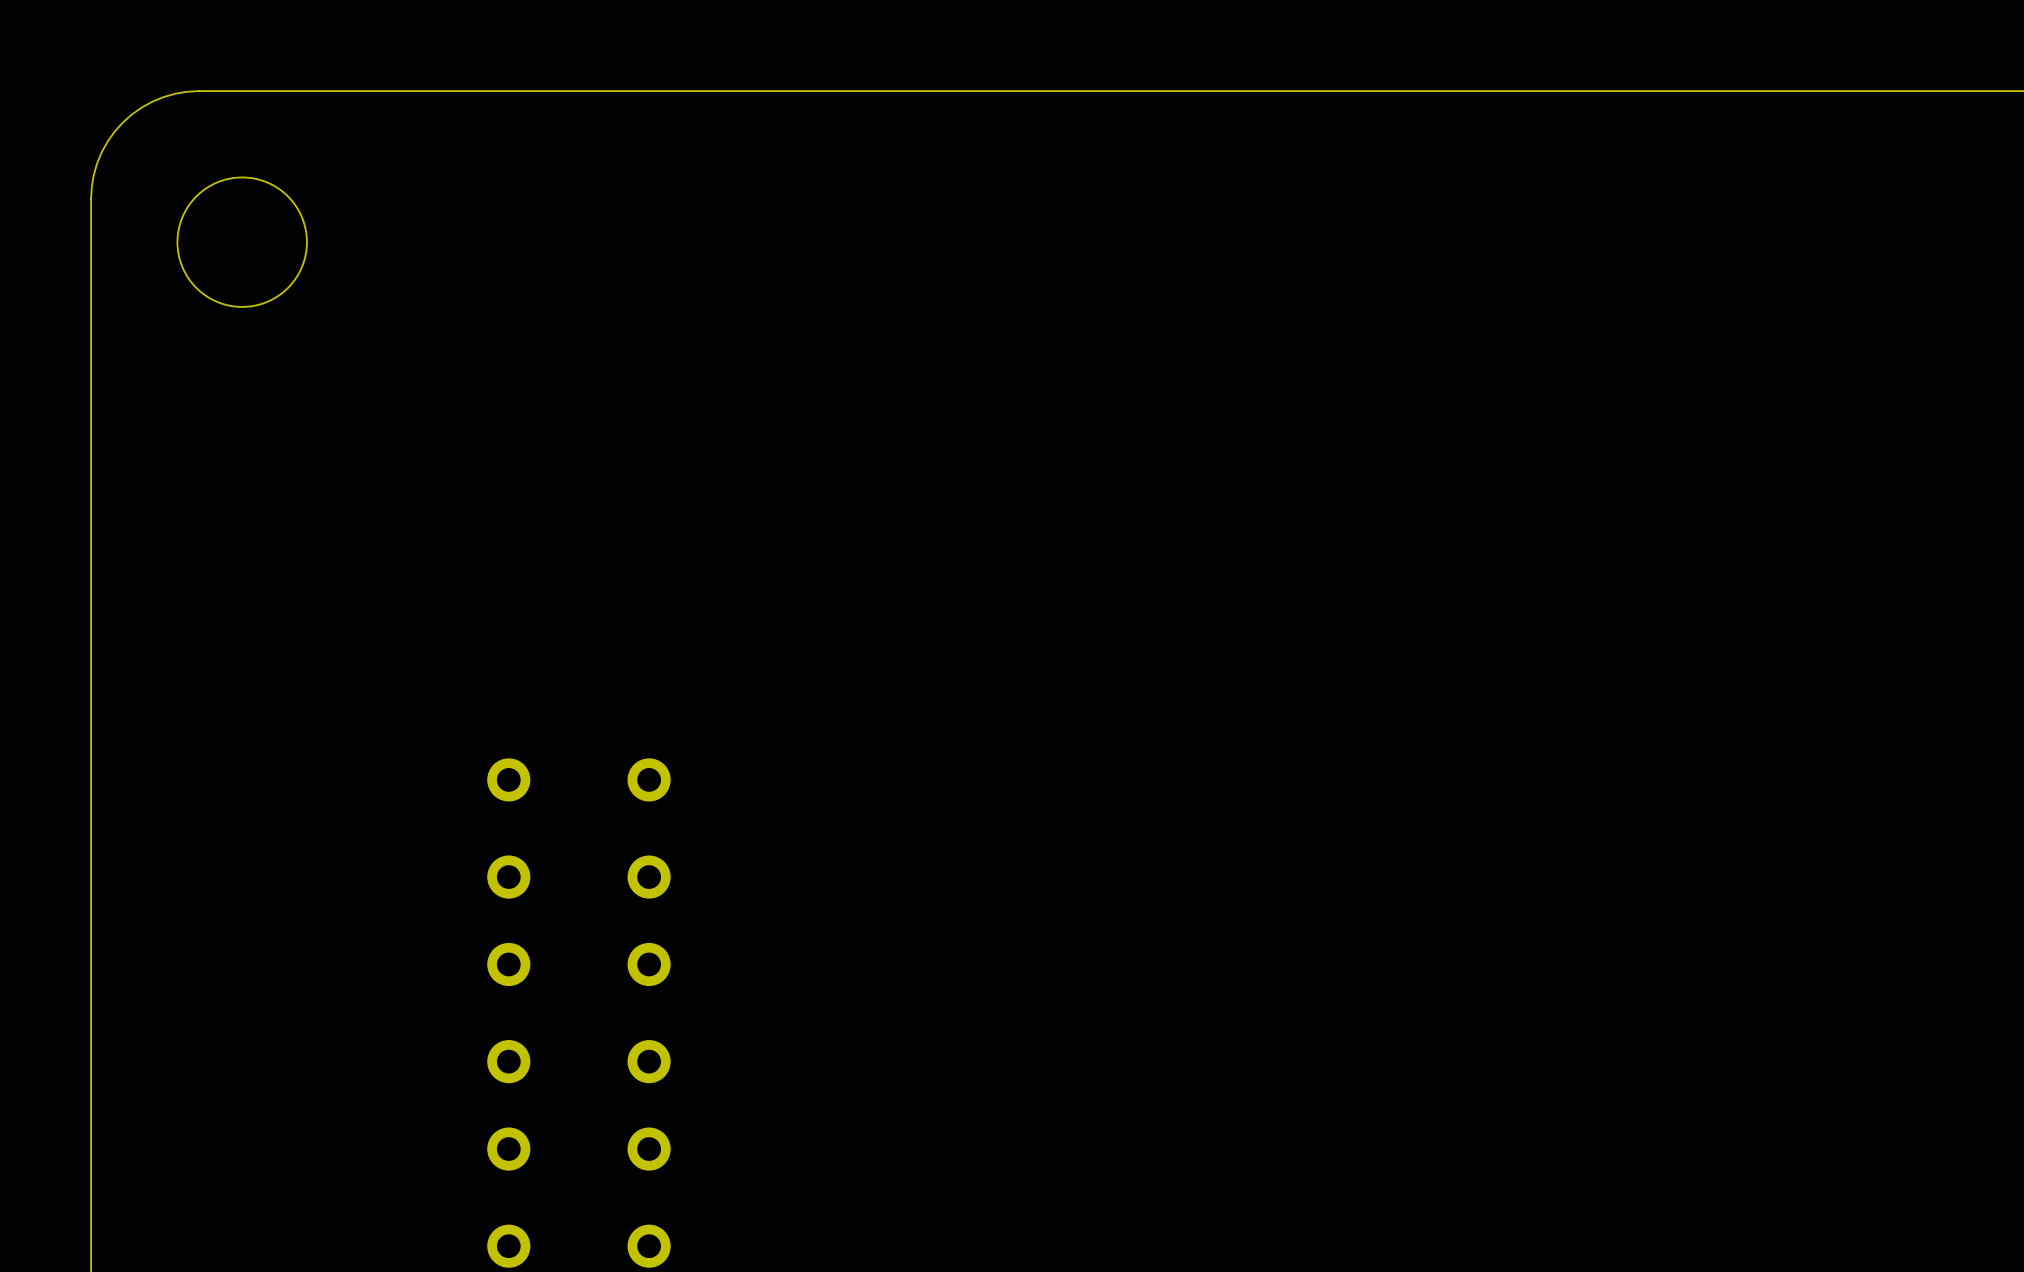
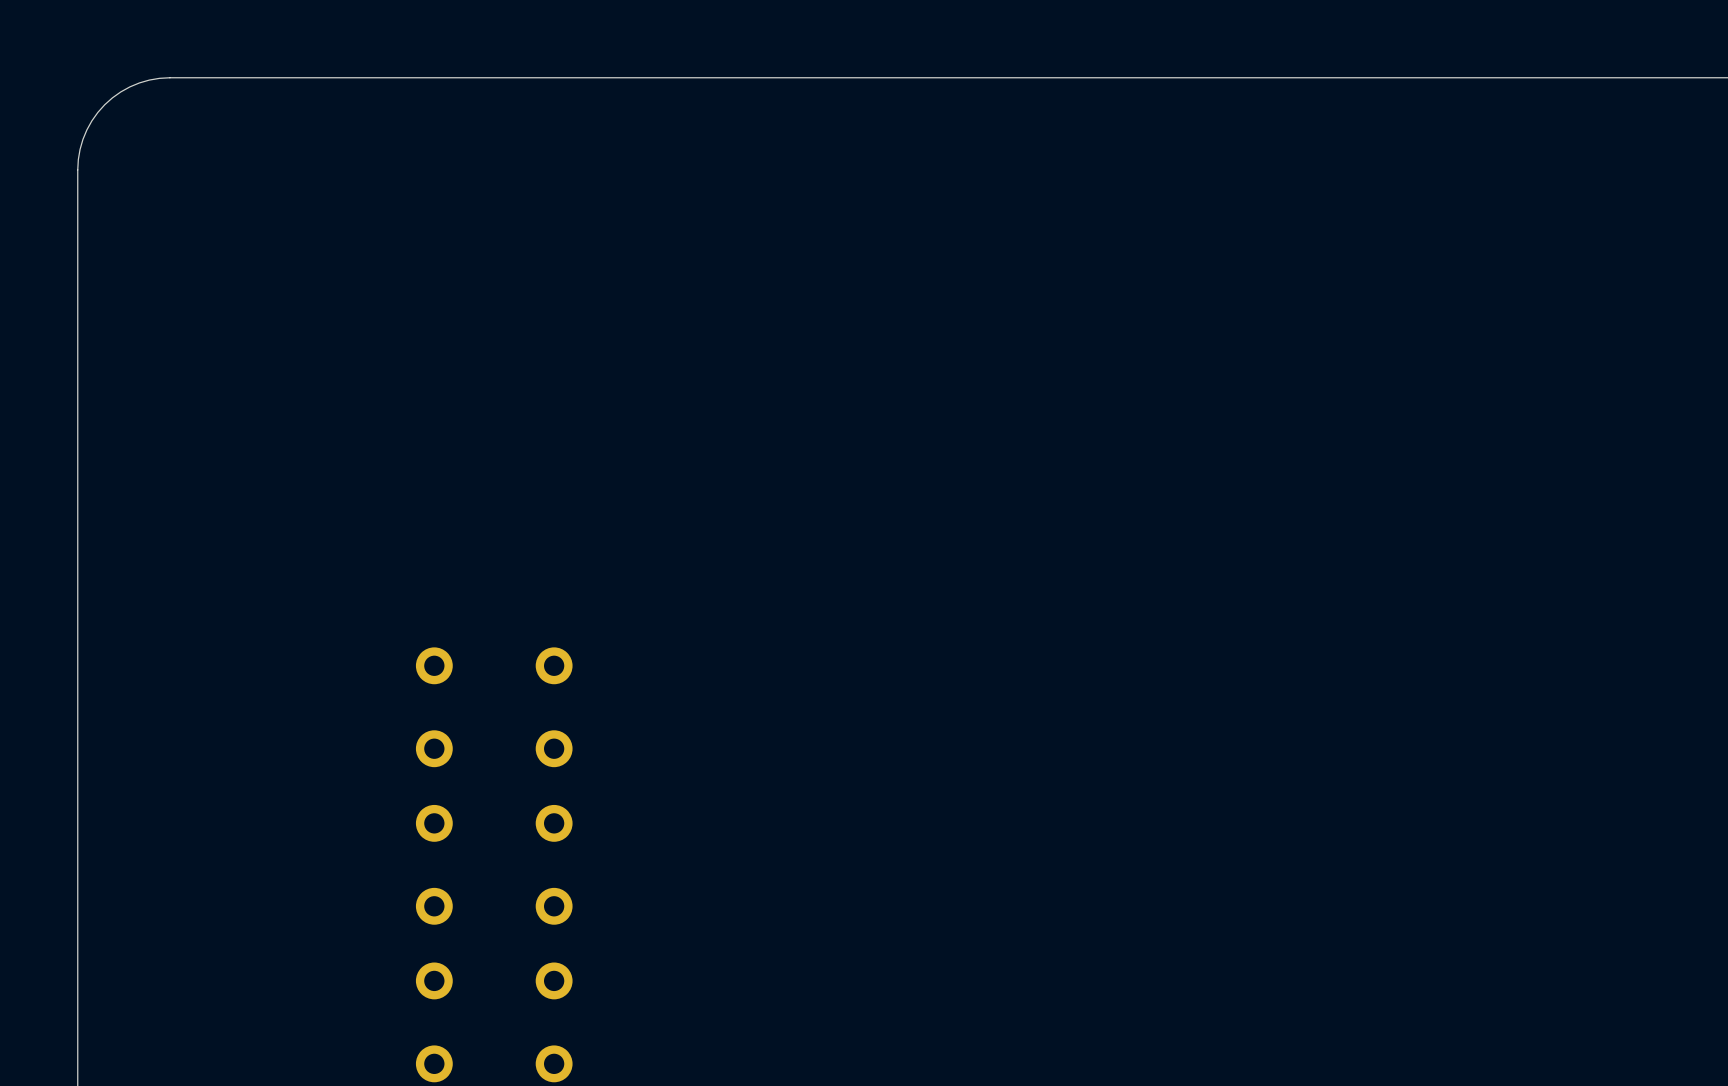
round board edge: [176, 176, 308, 308] -> none

